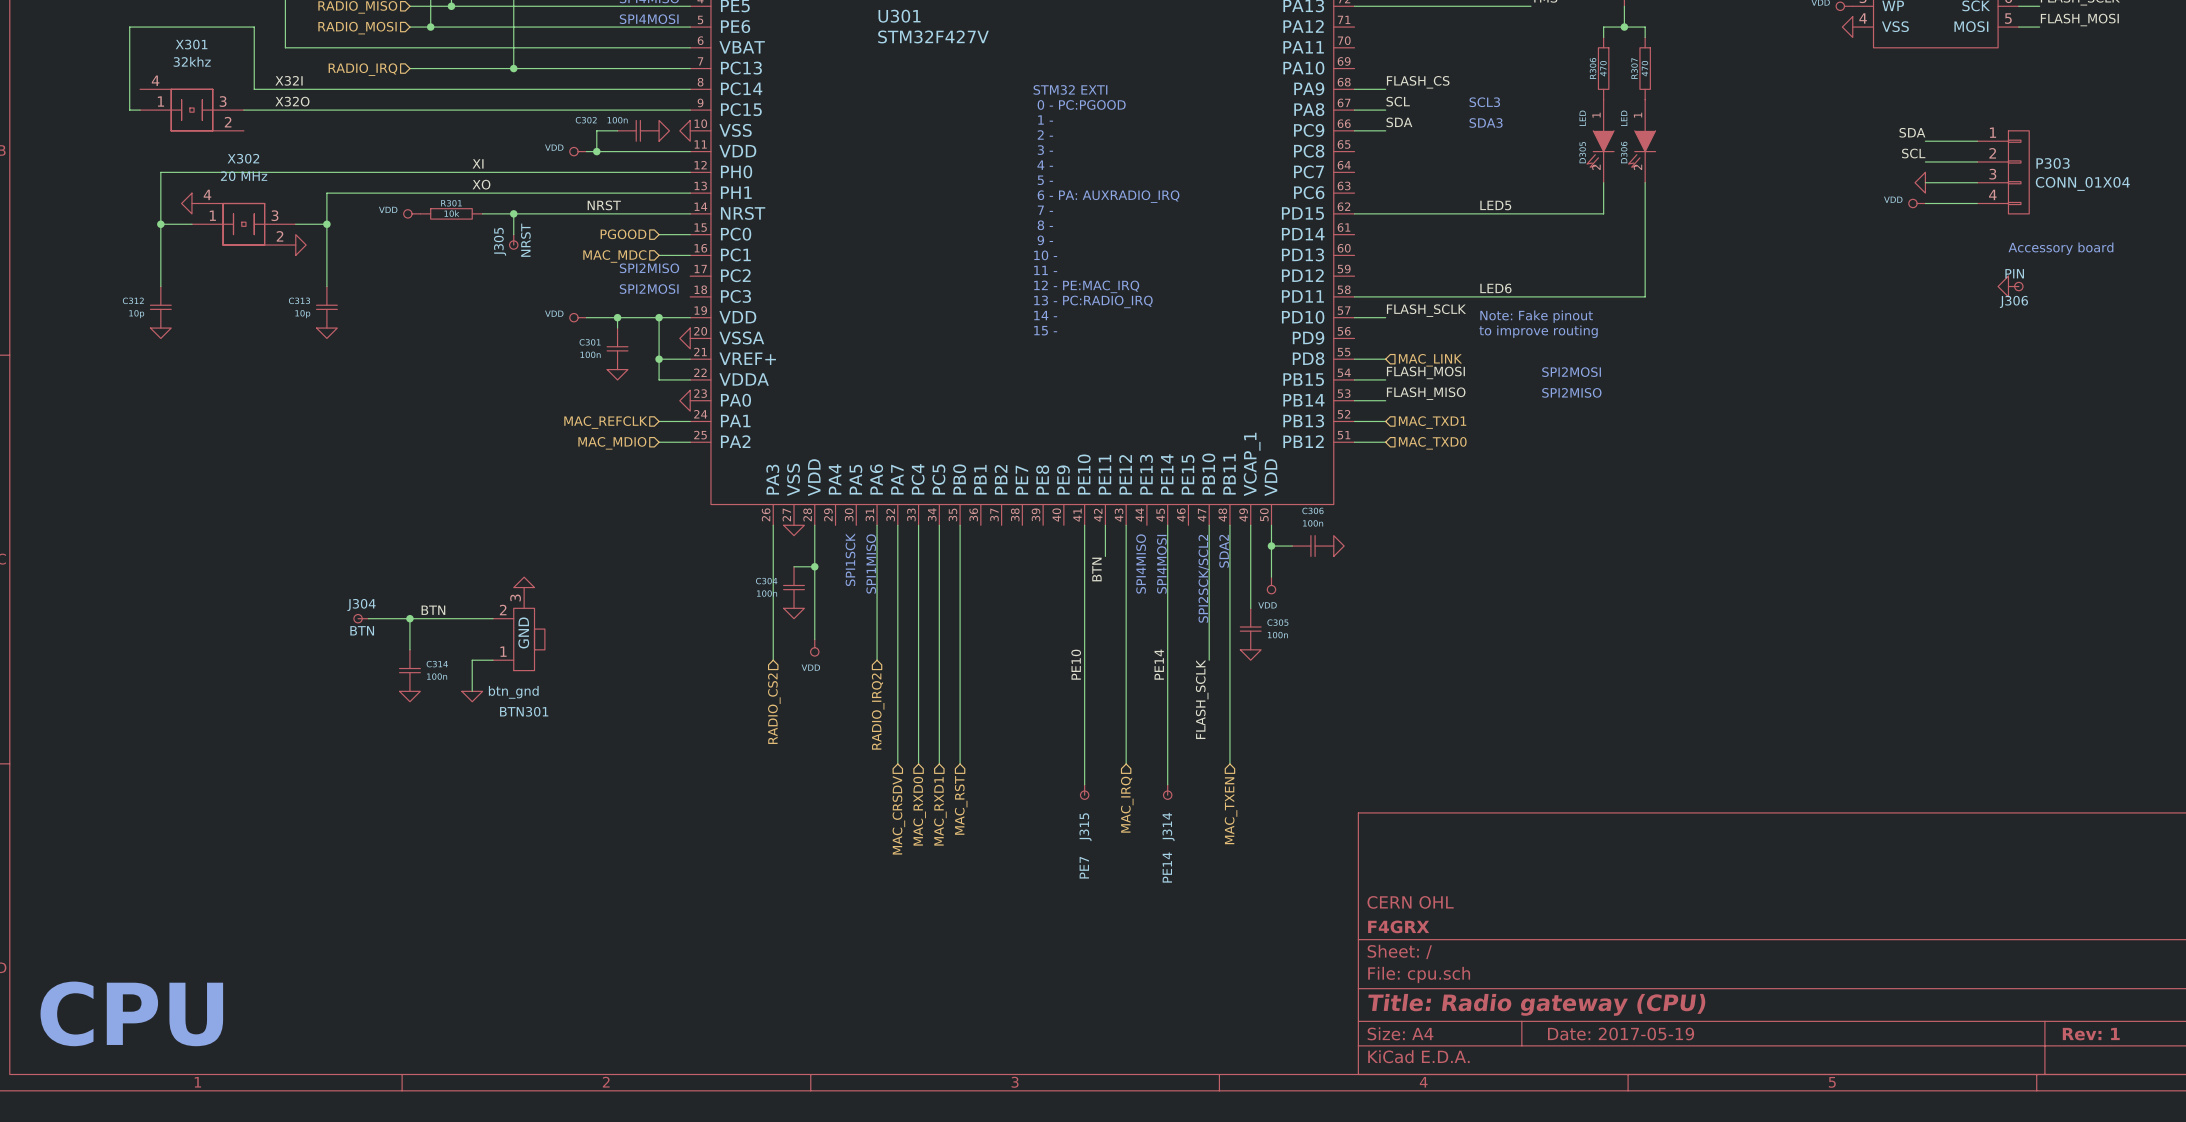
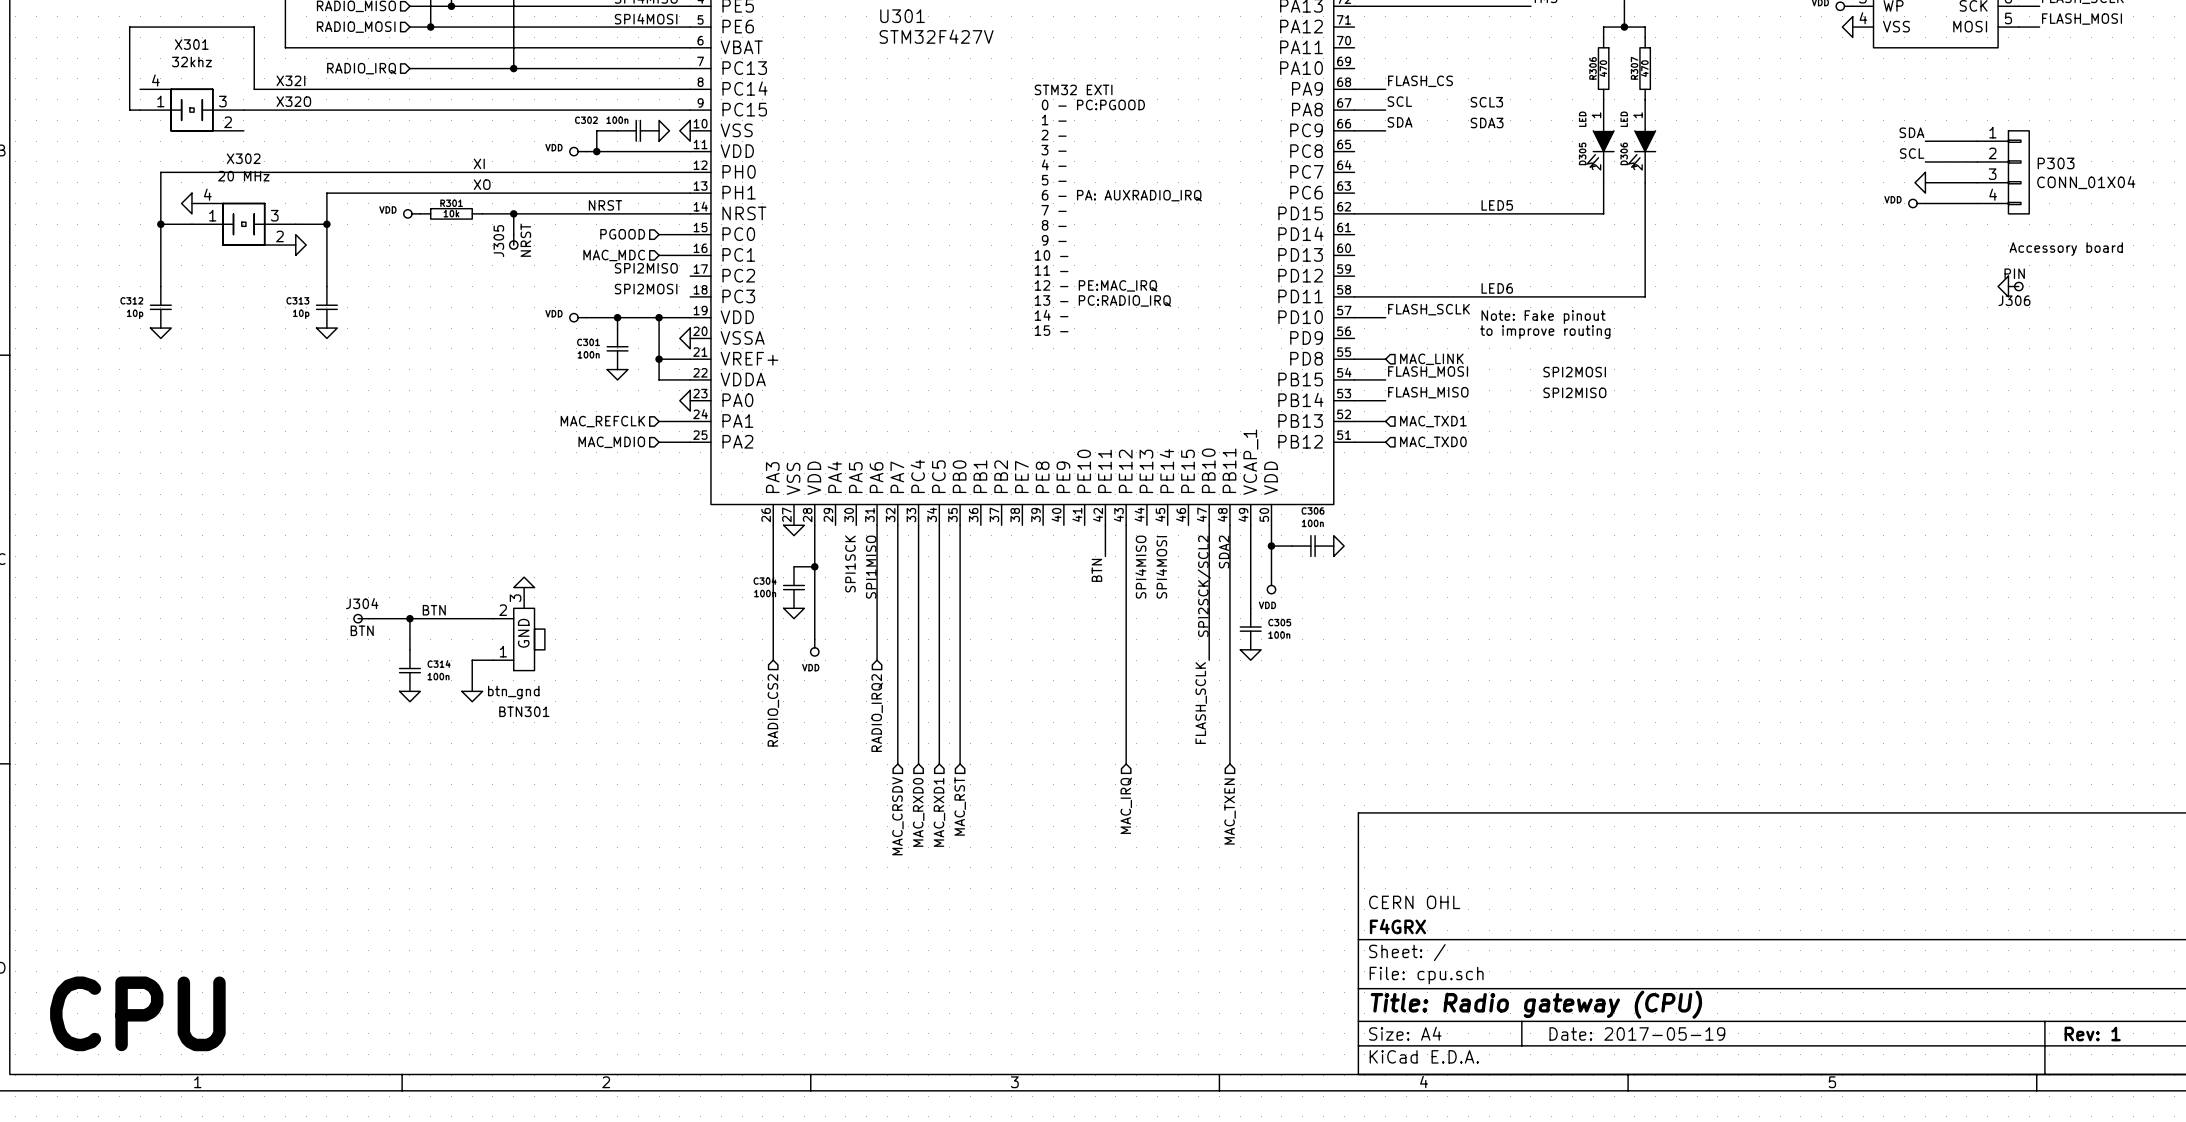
wire: (1084, 525) (1084, 784) -> none
wire: (1167, 525) (1167, 784) -> none
label: PE10 (1076, 664) -> none
label: PE14 (1159, 664) -> none
J315: PE7 (1084, 792) -> none
J314: PE14 (1167, 792) -> none

